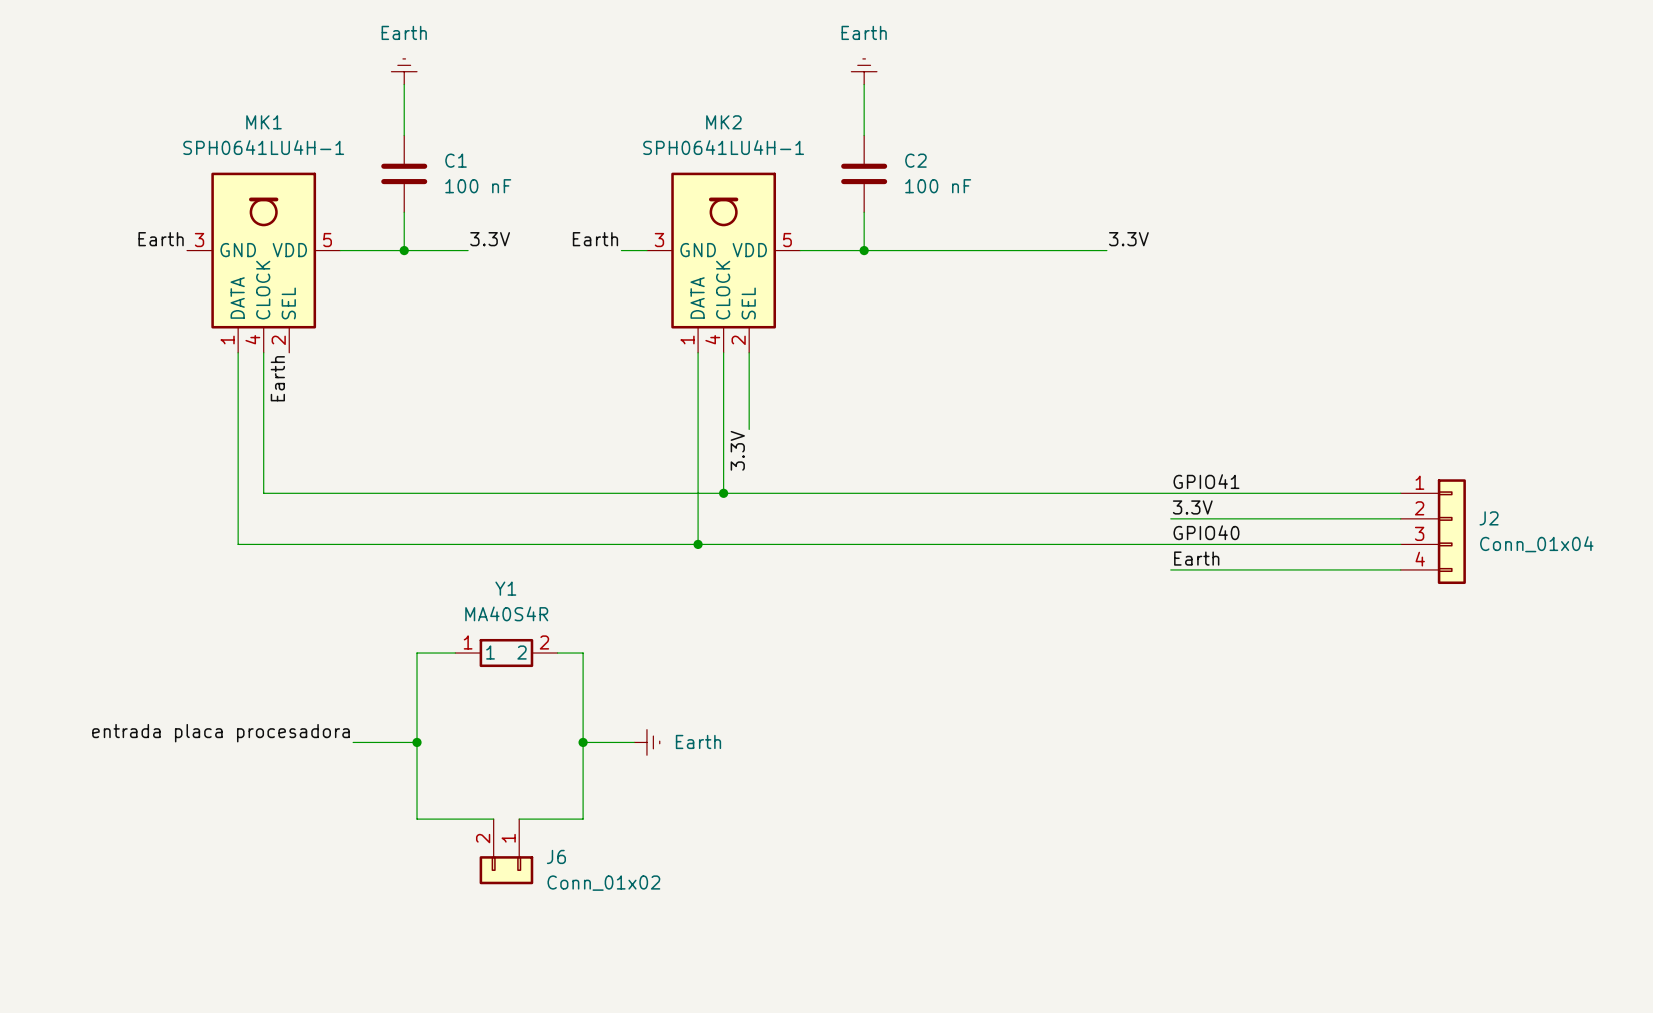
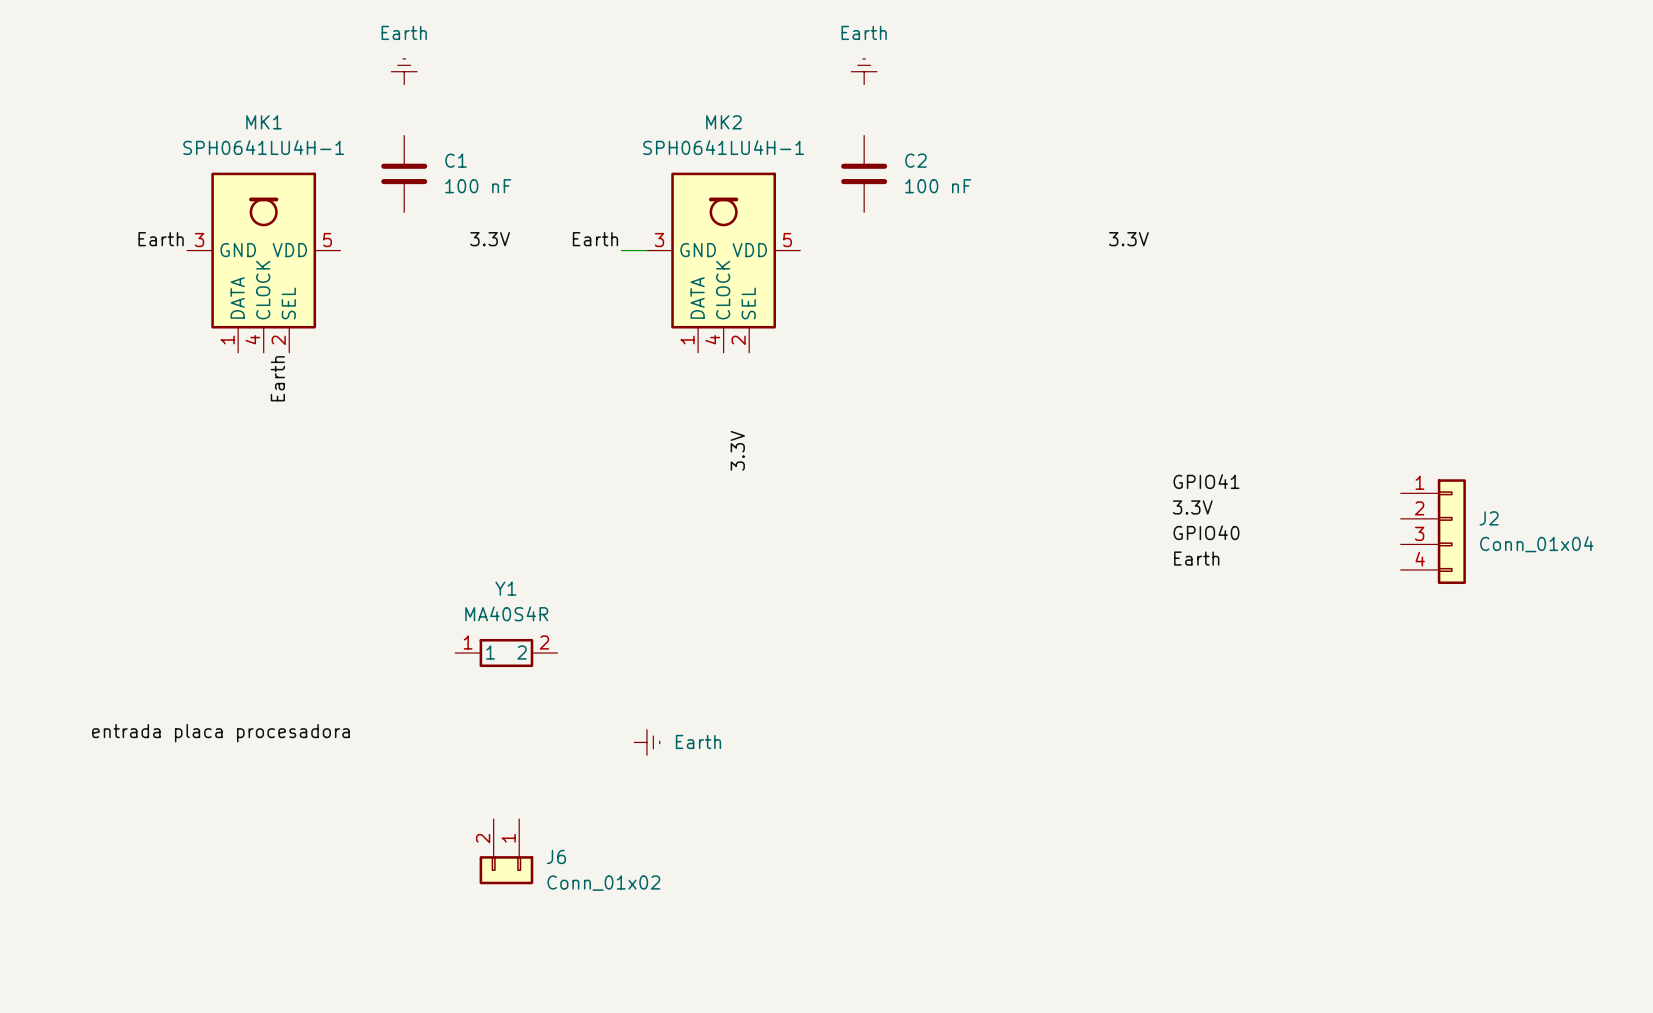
wire: (404, 84) (404, 135) -> none
wire: (864, 84) (864, 135) -> none
wire: (404, 212) (404, 250) -> none
wire: (864, 212) (864, 250) -> none
wire: (340, 250) (468, 250) -> none
junction: (404, 250) -> none
wire: (800, 250) (1106, 250) -> none
junction: (864, 250) -> none
wire: (238, 352) (238, 544) (1400, 544) -> none
wire: (263, 352) (263, 493) (1400, 493) -> none
wire: (698, 352) (698, 544) -> none
wire: (723, 352) (723, 493) -> none
wire: (749, 352) (749, 429) -> none
junction: (723, 493) -> none
wire: (1170, 518) (1400, 518) -> none
junction: (698, 544) -> none
wire: (1170, 569) (1400, 569) -> none
wire: (455, 653) (417, 653) (417, 819) (493, 819) -> none
wire: (557, 653) (583, 653) (583, 819) (519, 819) -> none
wire: (353, 742) (417, 742) -> none
junction: (417, 742) -> none
wire: (583, 742) (634, 742) -> none
junction: (583, 742) -> none

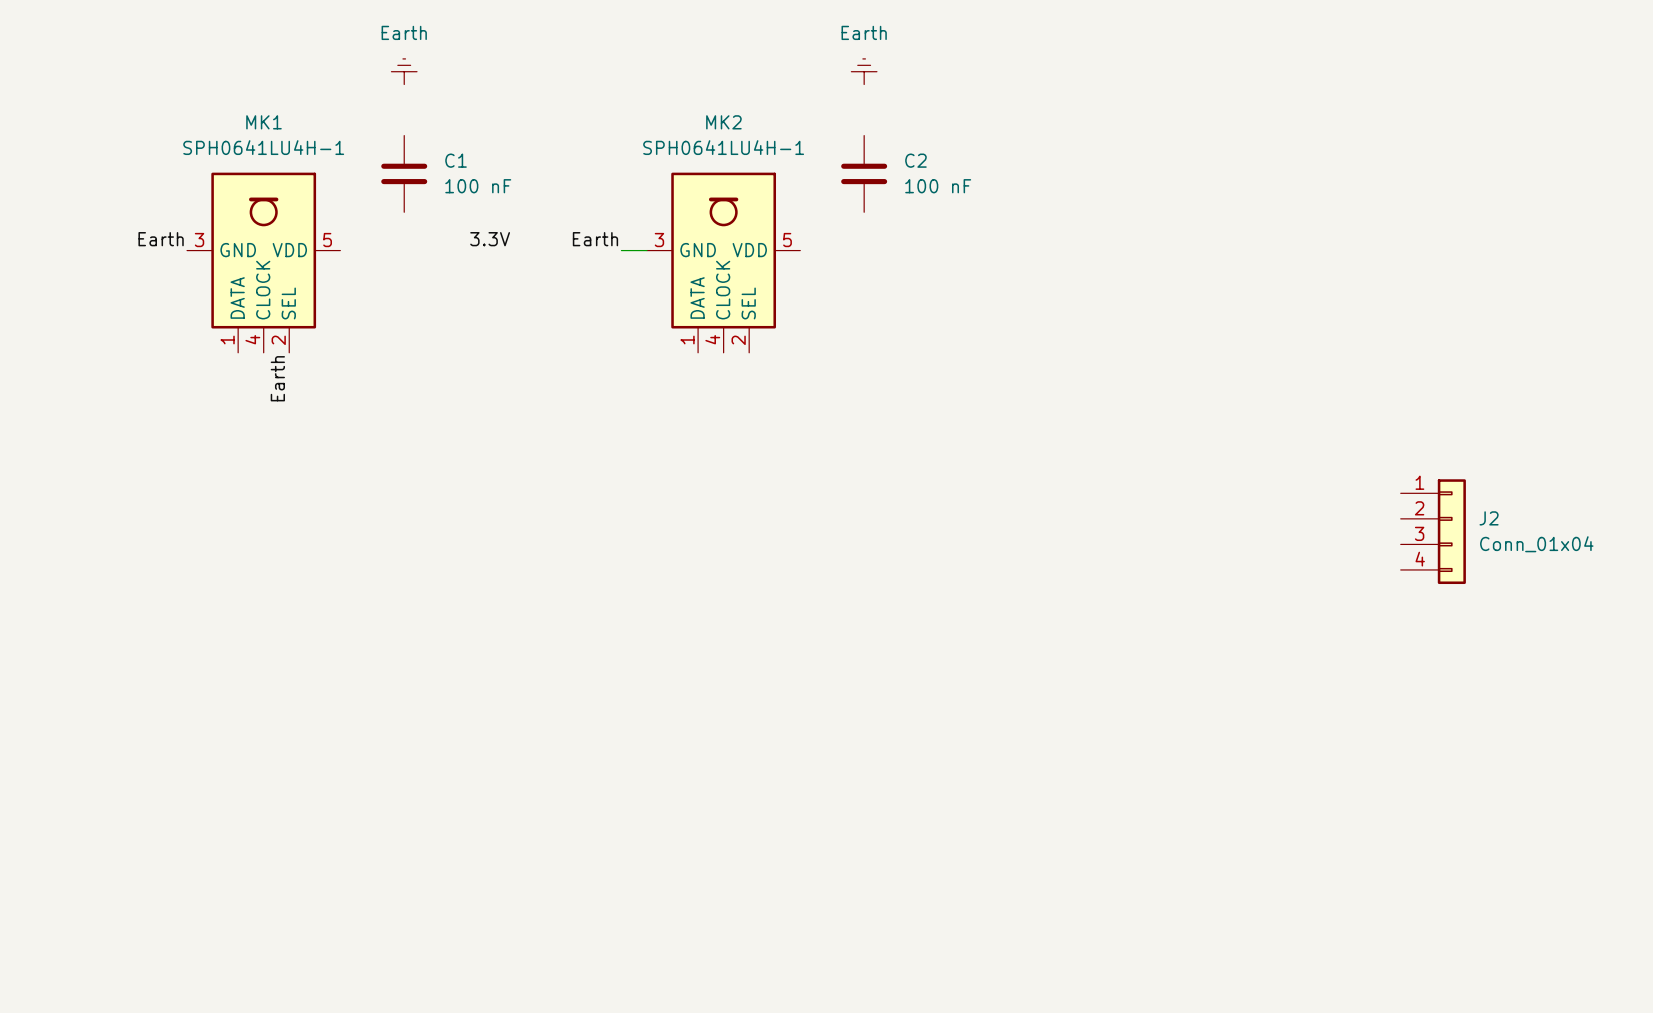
label: 3.3V (1128, 239) -> none
label: 3.3V (737, 450) -> none
label: GPIO41 (1206, 481) -> none
label: 3.3V (1192, 507) -> none
label: GPIO40 (1206, 532) -> none
label: Earth (1196, 558) -> none
Y1: MA40S4R (506, 653) -> none
label: entrada placa procesadora (221, 733) -> none
power symbol: Earth (646, 742) -> none
J6: Conn_01x02 (506, 851) -> none

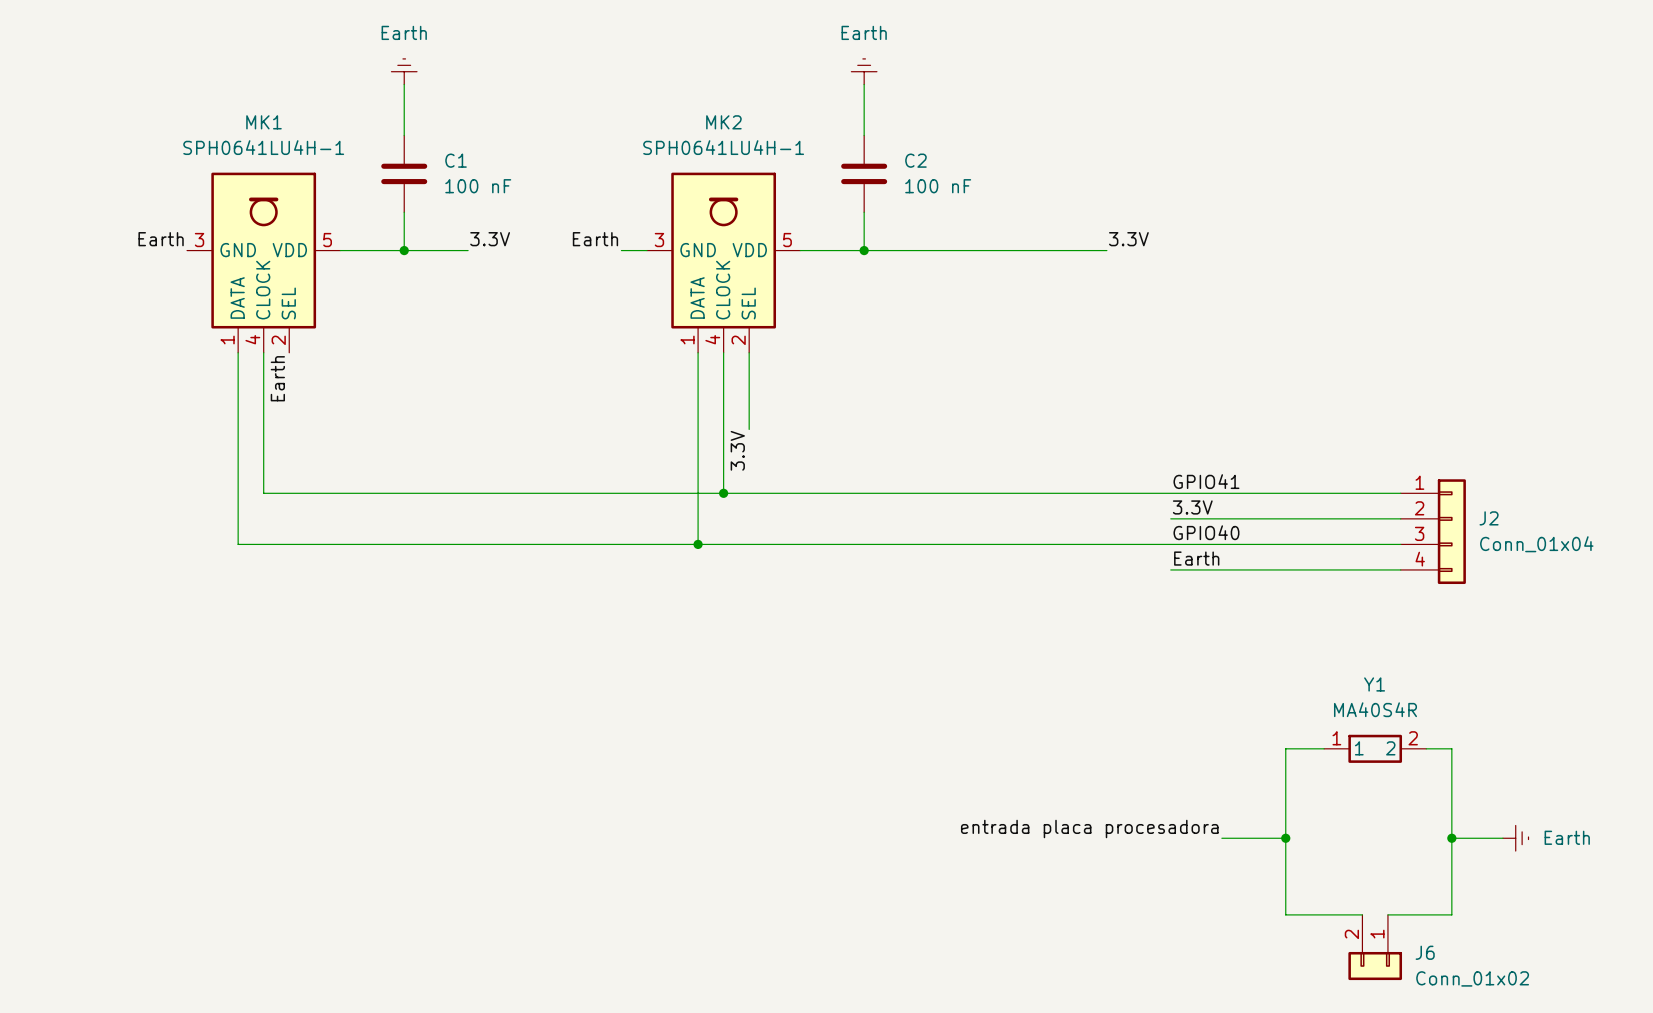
wire: none -> (404, 84) (404, 135)
wire: none -> (864, 84) (864, 135)
wire: none -> (404, 212) (404, 250)
wire: none -> (864, 212) (864, 250)
label: none -> 3.3V (1128, 239)
wire: none -> (340, 250) (468, 250)
junction: none -> (404, 250)
wire: none -> (800, 250) (1106, 250)
junction: none -> (864, 250)
wire: none -> (238, 352) (238, 544) (1400, 544)
wire: none -> (263, 352) (263, 493) (1400, 493)
wire: none -> (698, 352) (698, 544)
wire: none -> (723, 352) (723, 493)
wire: none -> (749, 352) (749, 429)
label: none -> 3.3V (737, 450)
label: none -> GPIO41 (1206, 481)
junction: none -> (723, 493)
label: none -> 3.3V (1192, 507)
wire: none -> (1170, 518) (1400, 518)
label: none -> GPIO40 (1206, 532)
junction: none -> (698, 544)
label: none -> Earth (1196, 558)
wire: none -> (1170, 569) (1400, 569)
wire: none -> (1324, 748) (1285, 748) (1285, 914) (1362, 914)
Y1: none -> MA40S4R (1375, 748)
wire: none -> (1426, 748) (1451, 748) (1451, 914) (1387, 914)
label: none -> entrada placa procesadora (1089, 828)
wire: none -> (1221, 838) (1285, 838)
junction: none -> (1285, 838)
wire: none -> (1451, 838) (1502, 838)
junction: none -> (1451, 838)
power symbol: none -> Earth (1515, 838)
J6: none -> Conn_01x02 (1375, 947)

